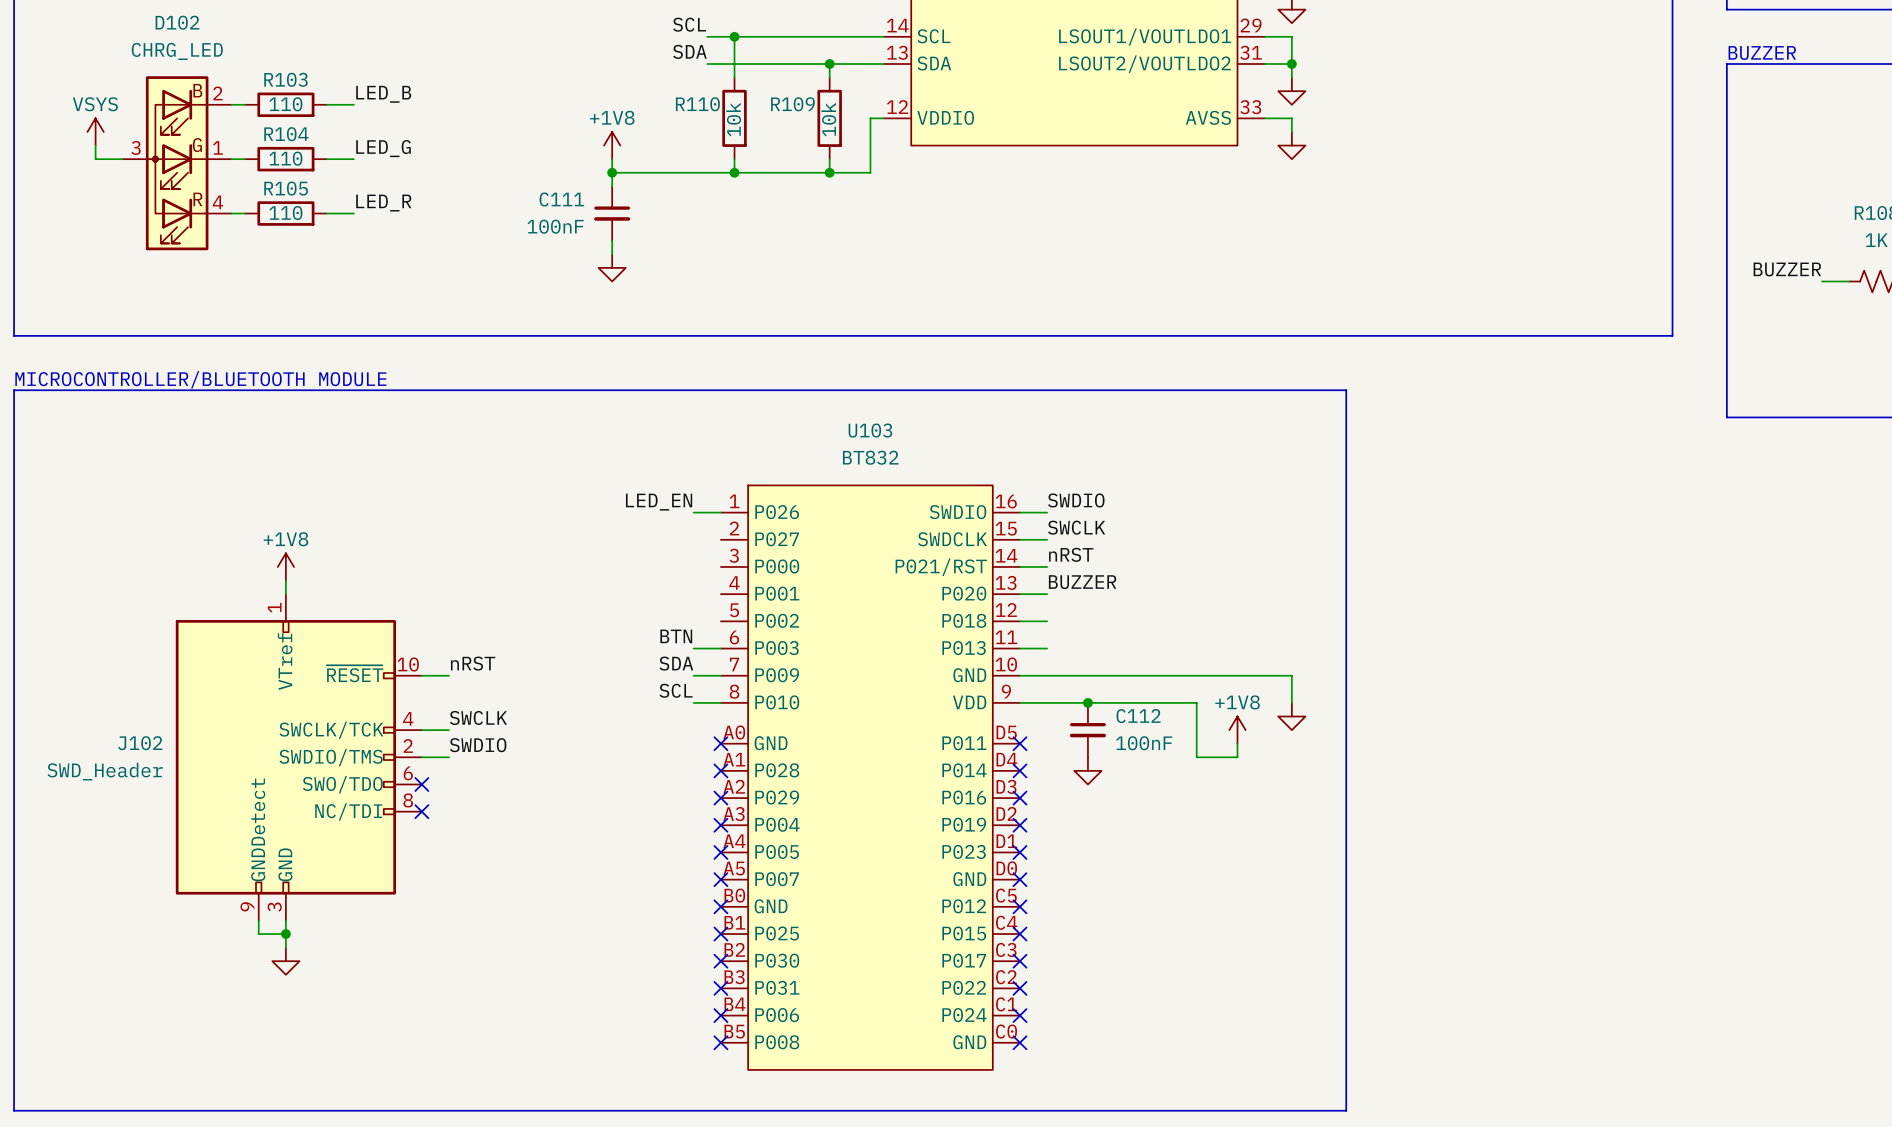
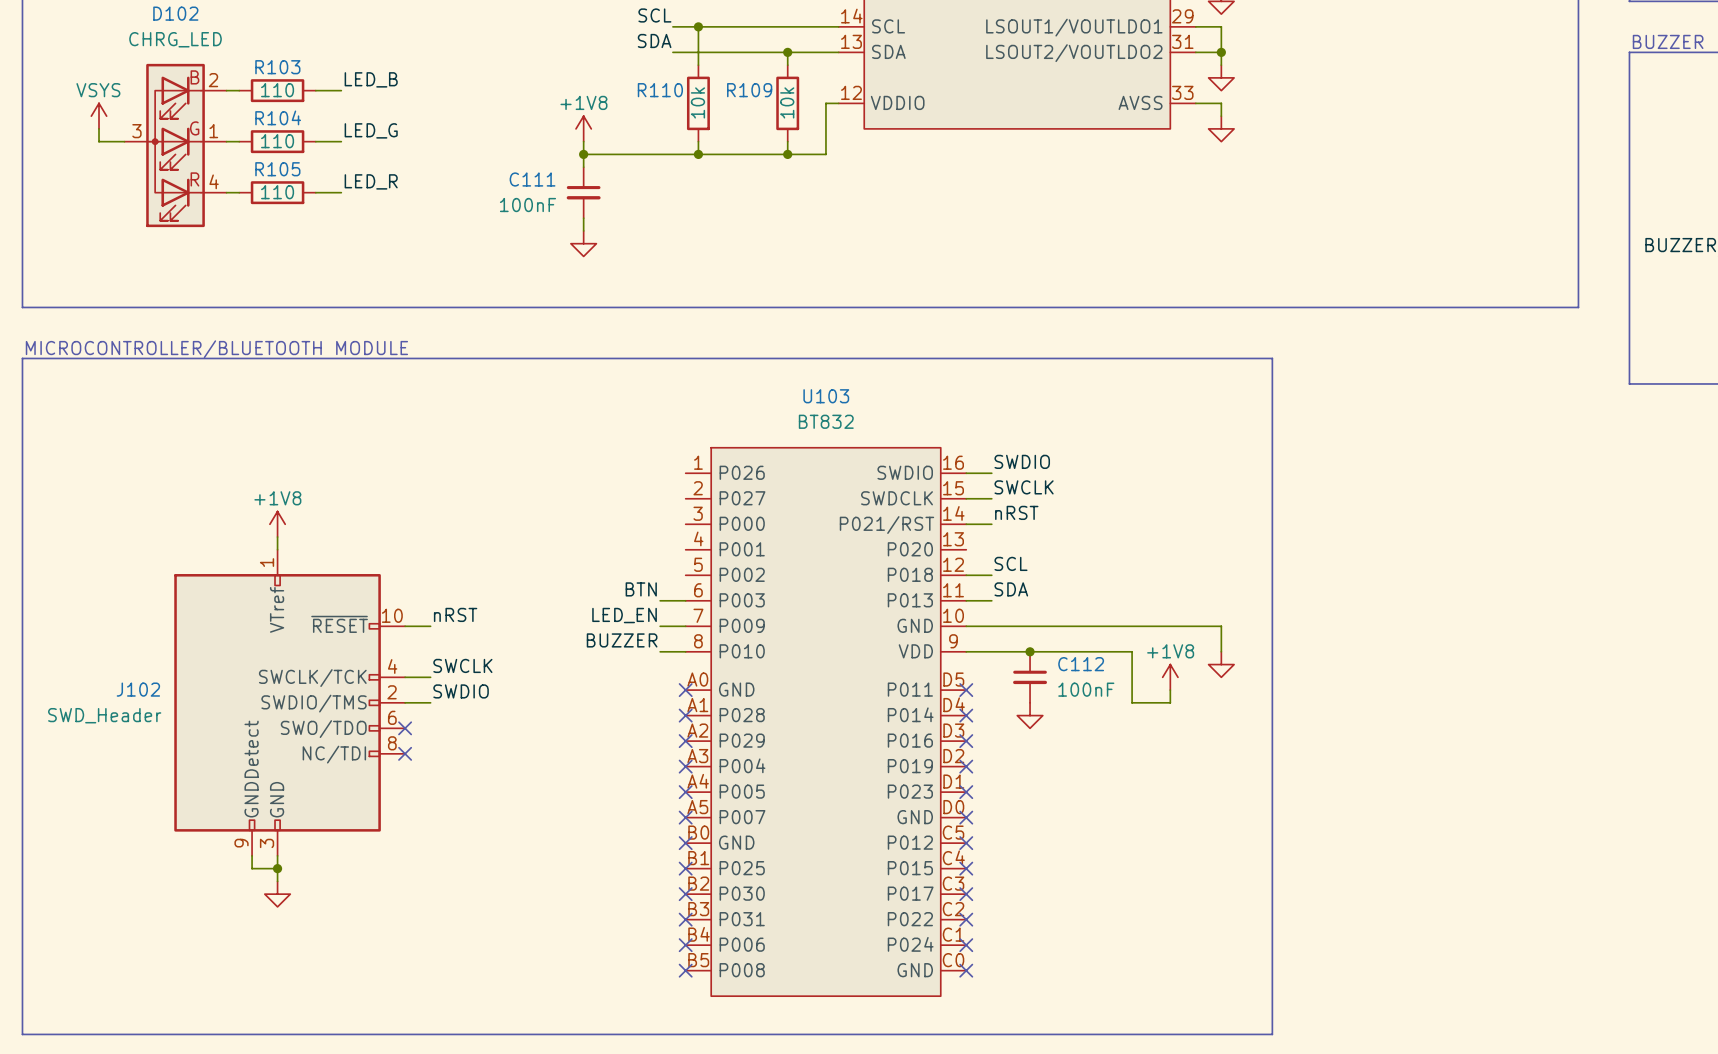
label: LED_EN (659, 502) -> none
wire: (693, 512) (720, 512) -> none
label: BUZZER (1082, 582) -> none
wire: (1019, 594) (1047, 594) -> none
label: none -> SCL (1011, 563)
label: none -> SDA (1011, 589)
label: SDA (676, 663) -> LED_EN (624, 615)
label: SCL (676, 690) -> BUZZER (622, 640)

